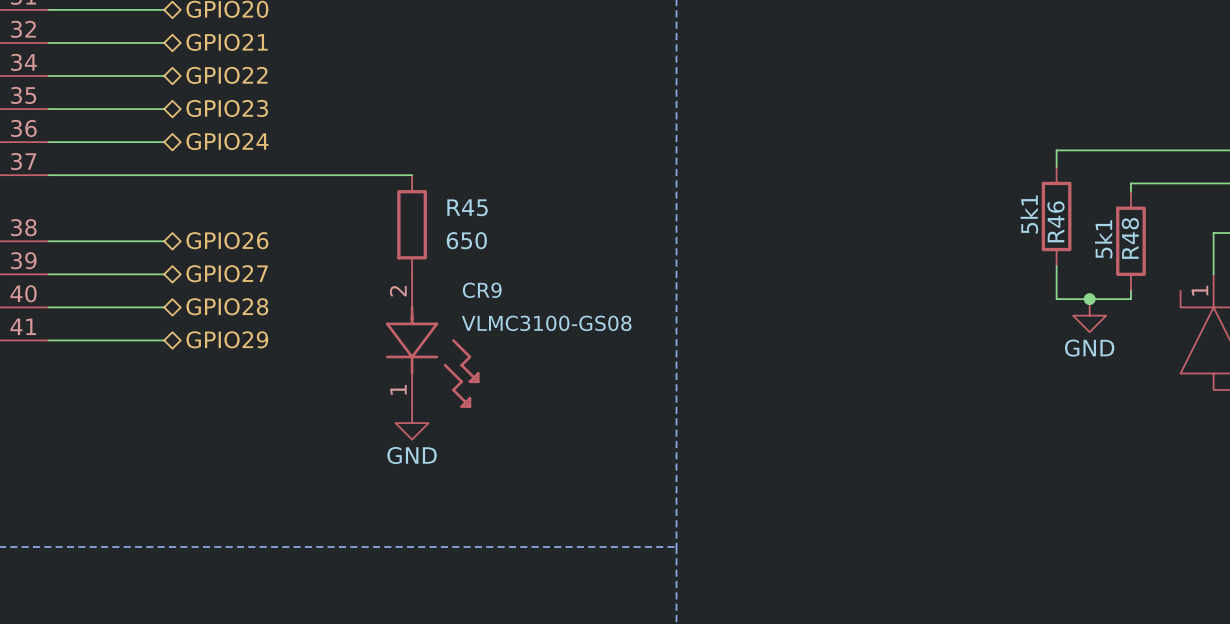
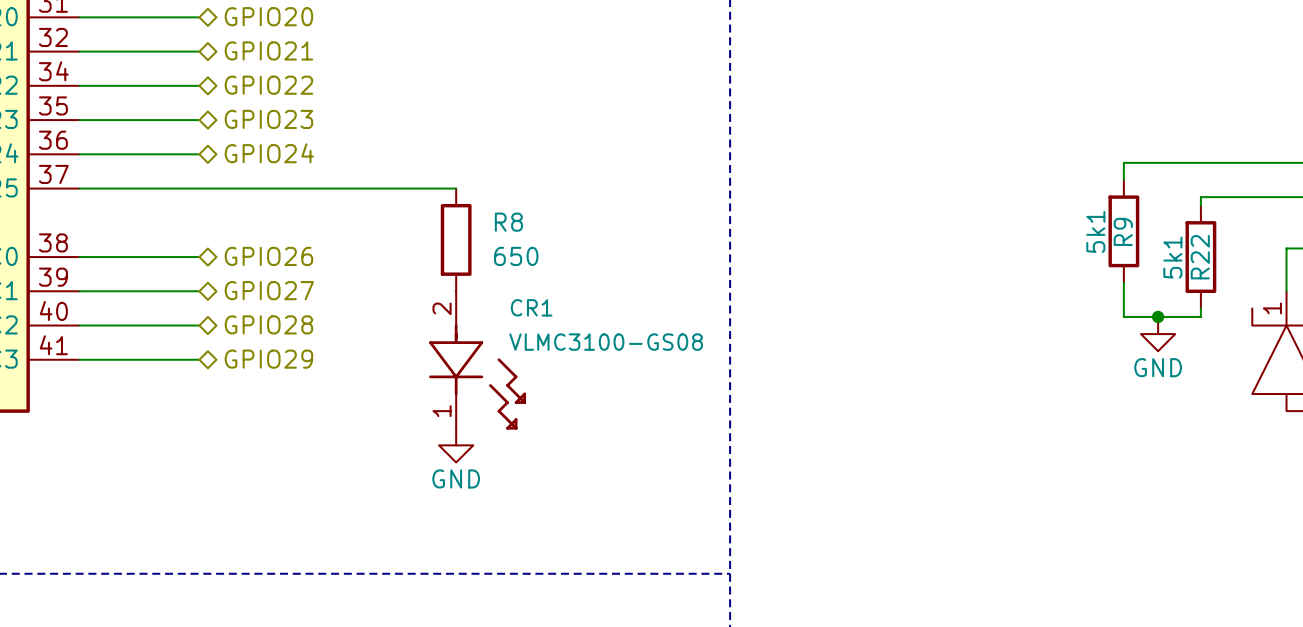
R45 name: R45 (467, 207) -> R8 (508, 222)
R46 name: R46 (1056, 221) -> R9 (1123, 231)
R48 name: R48 (1130, 238) -> R22 (1200, 257)
CR9 name: CR9 (482, 290) -> CR1 (531, 307)

